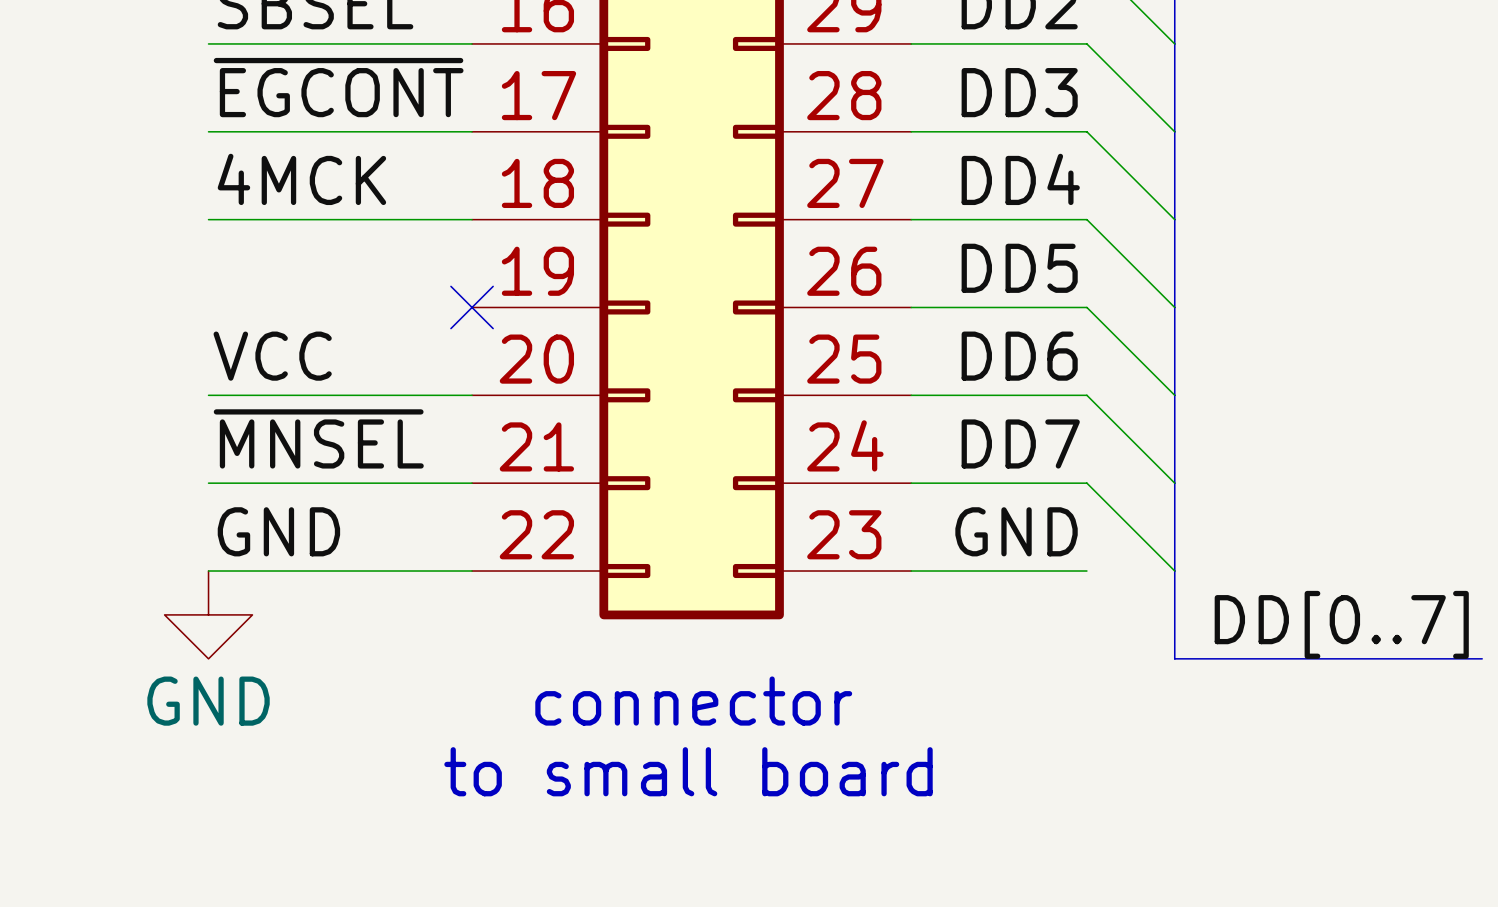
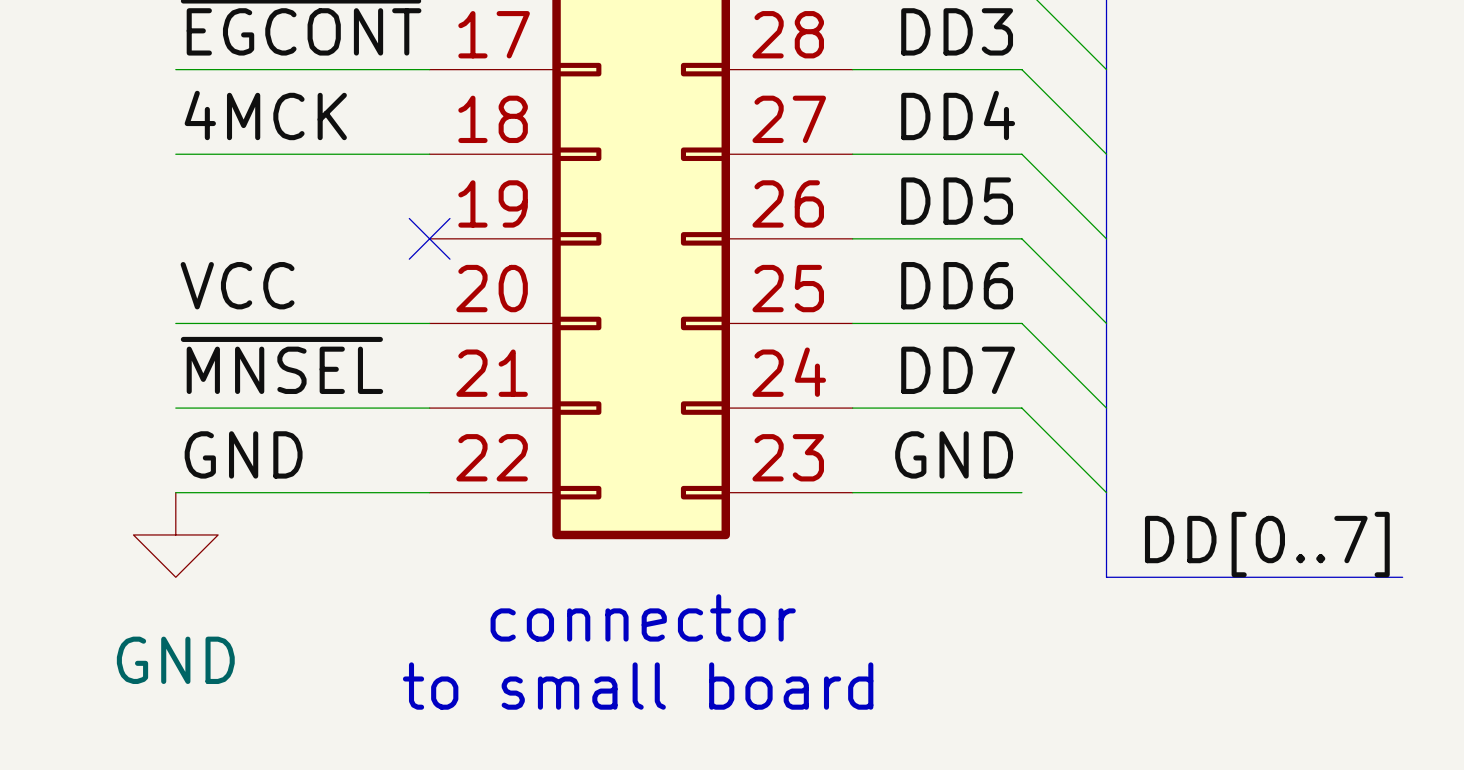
power symbol text position: GND (208, 701) -> GND (175, 660)

